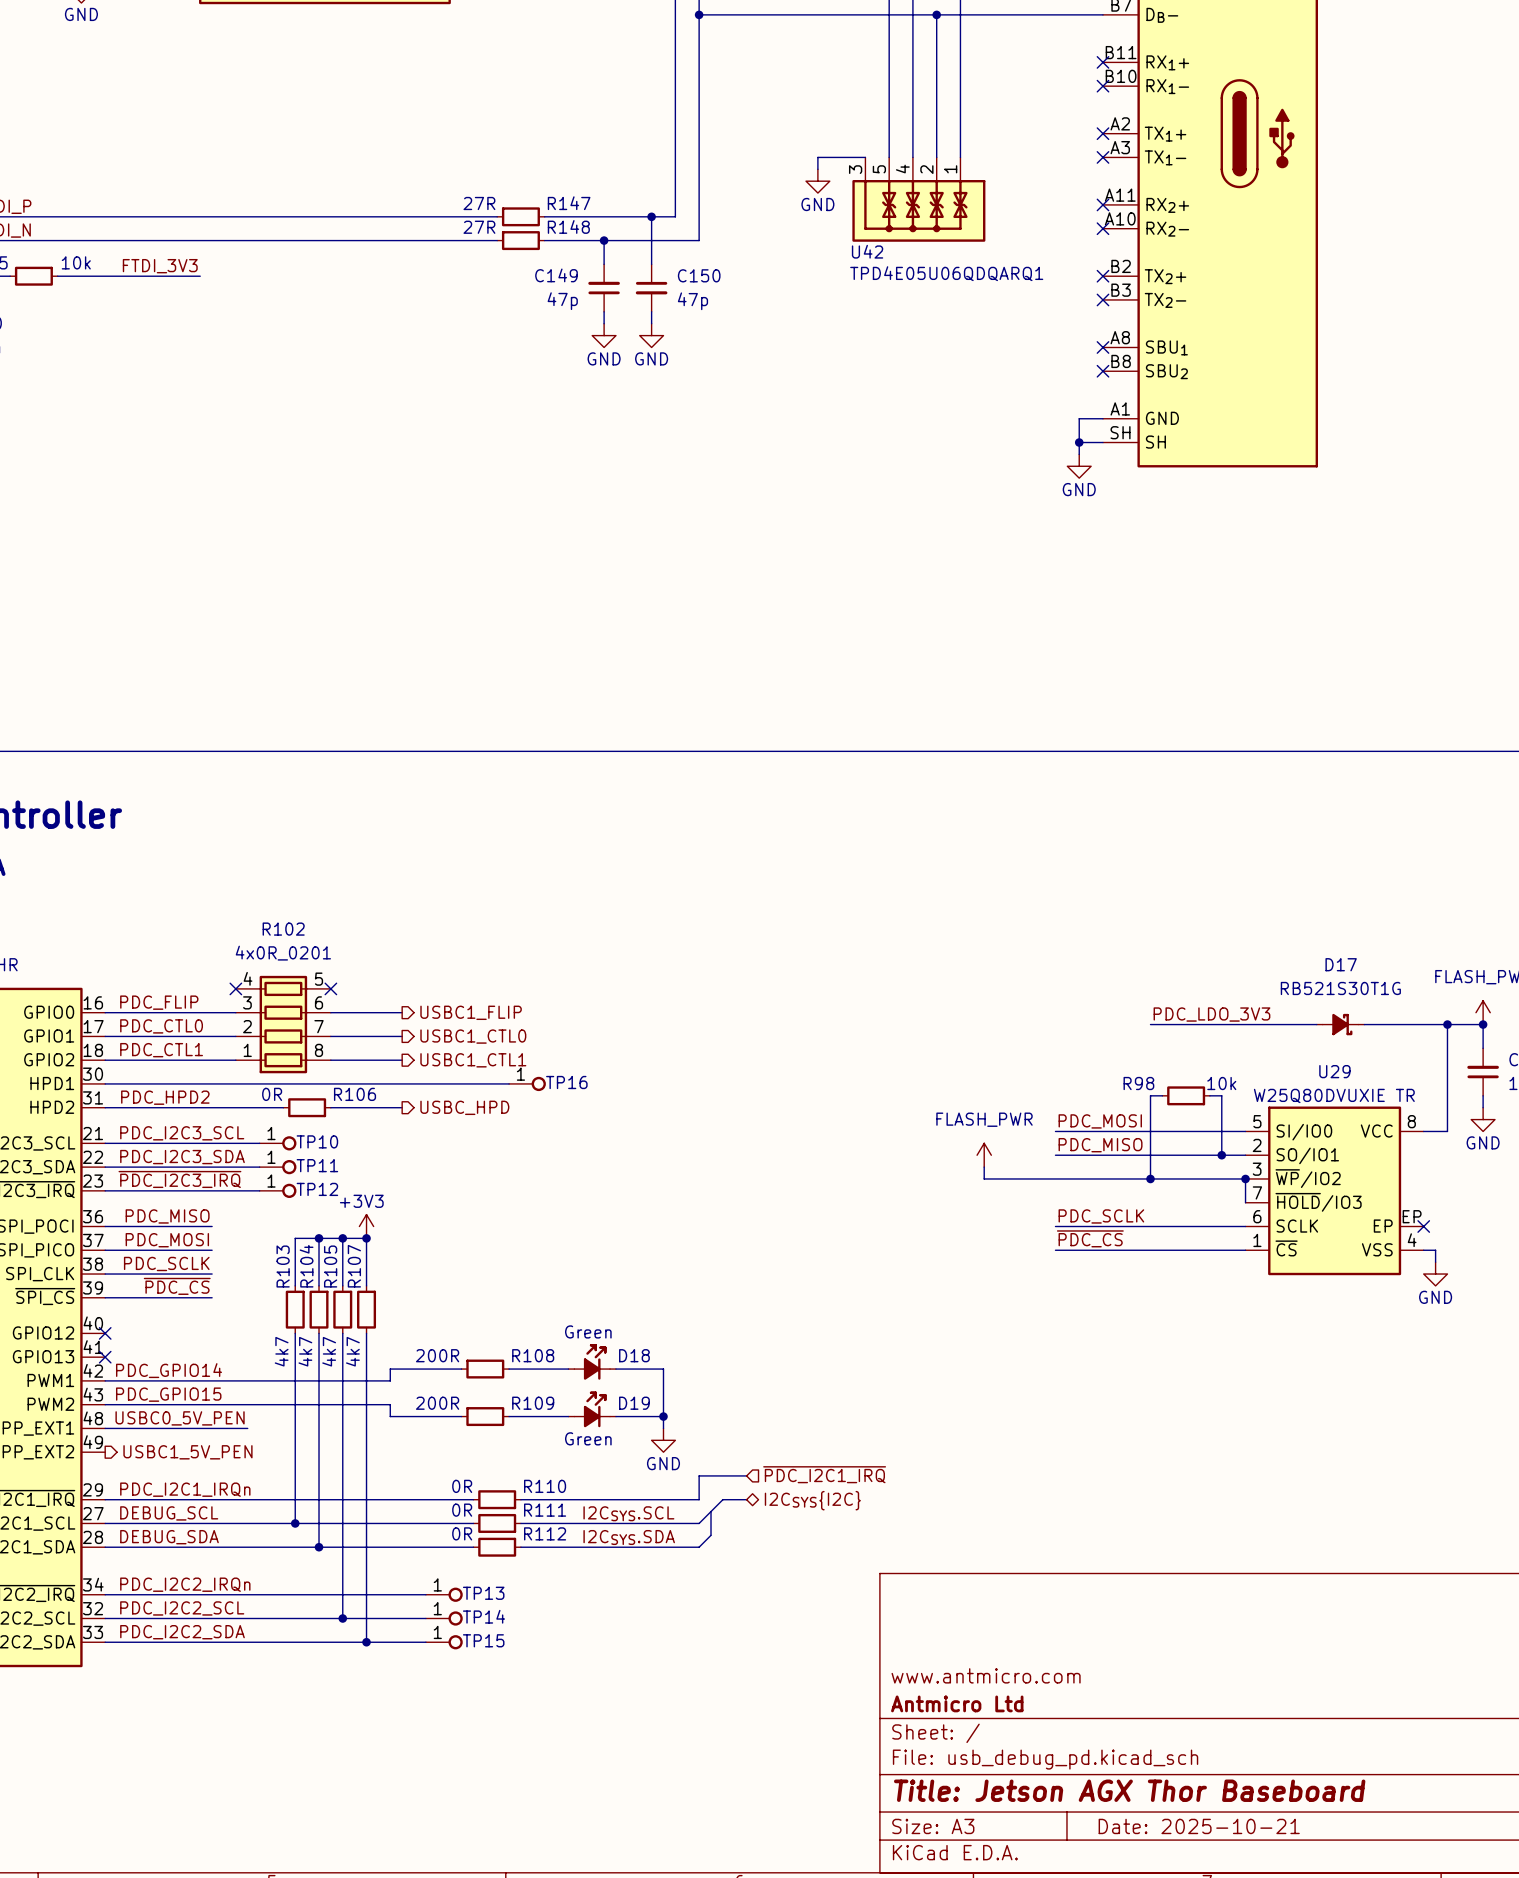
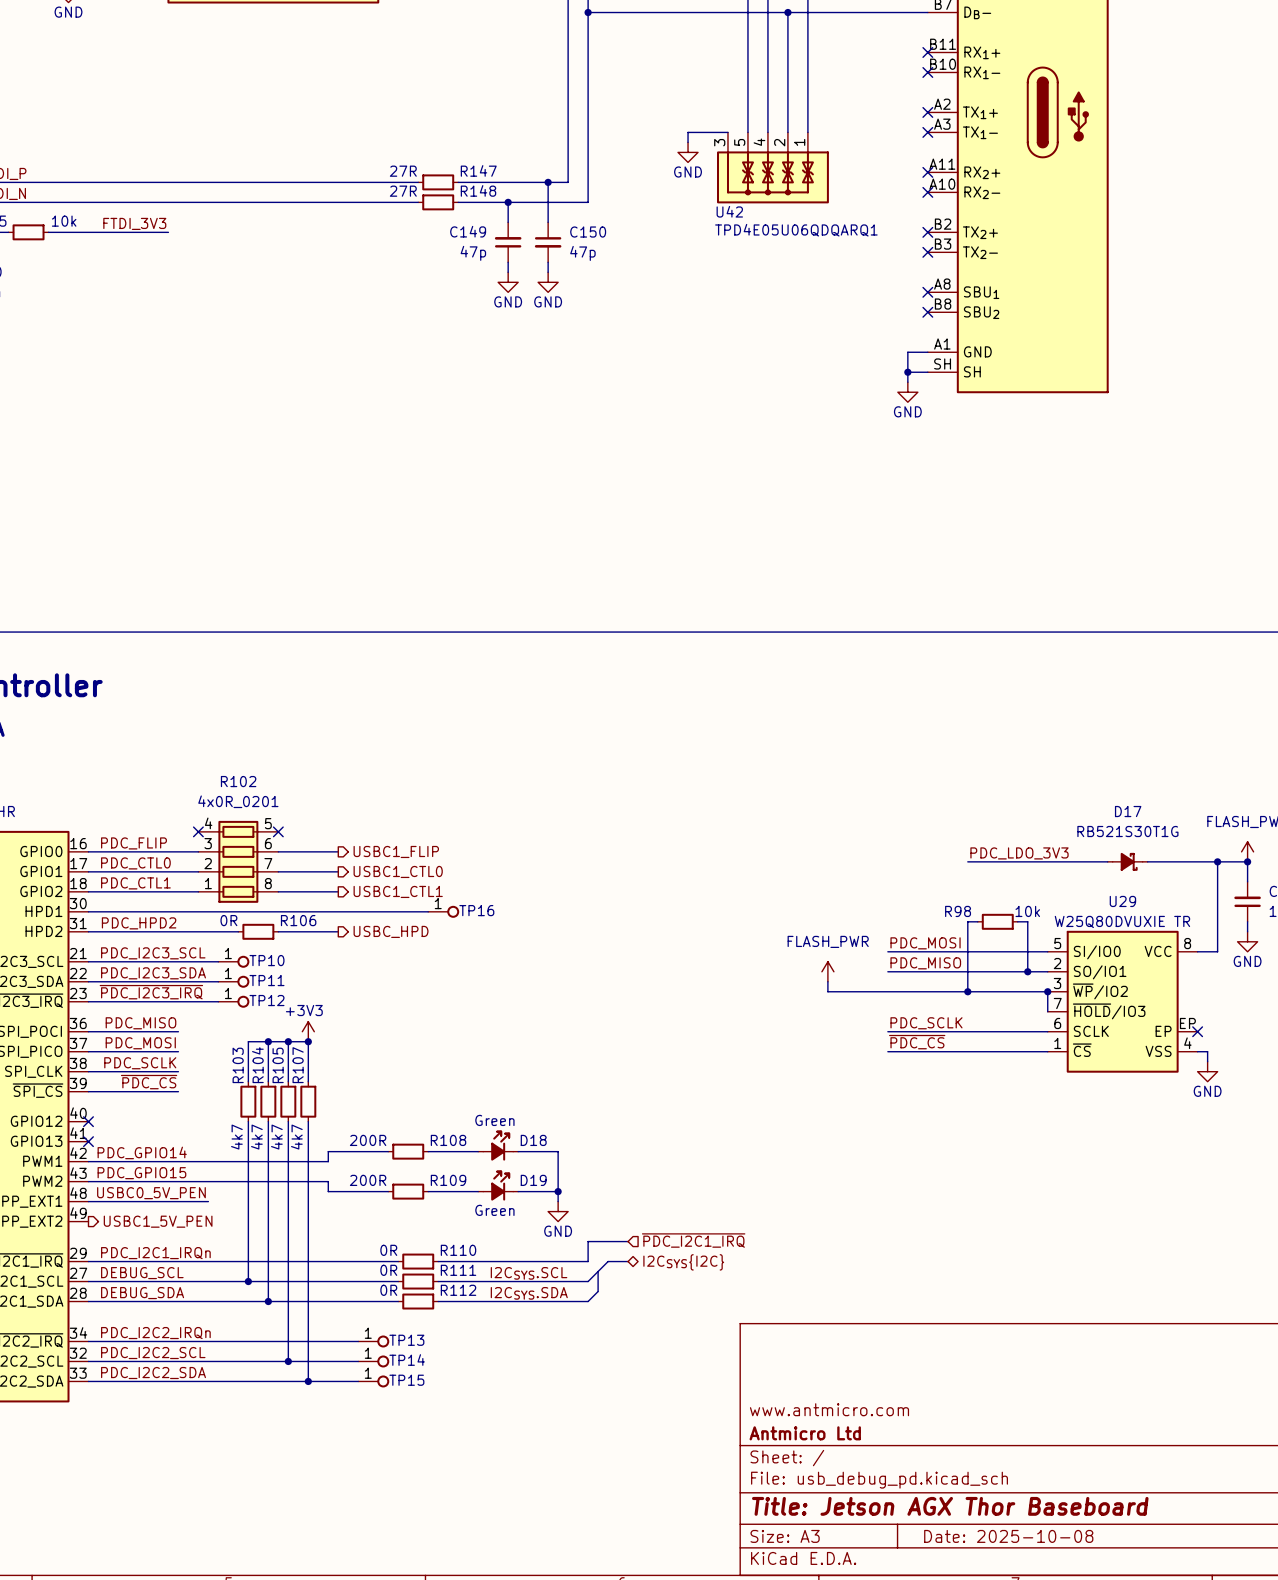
title block: Date: 2025-10-21 (1199, 1826) -> Date: 2025-10-08 (1008, 1536)

